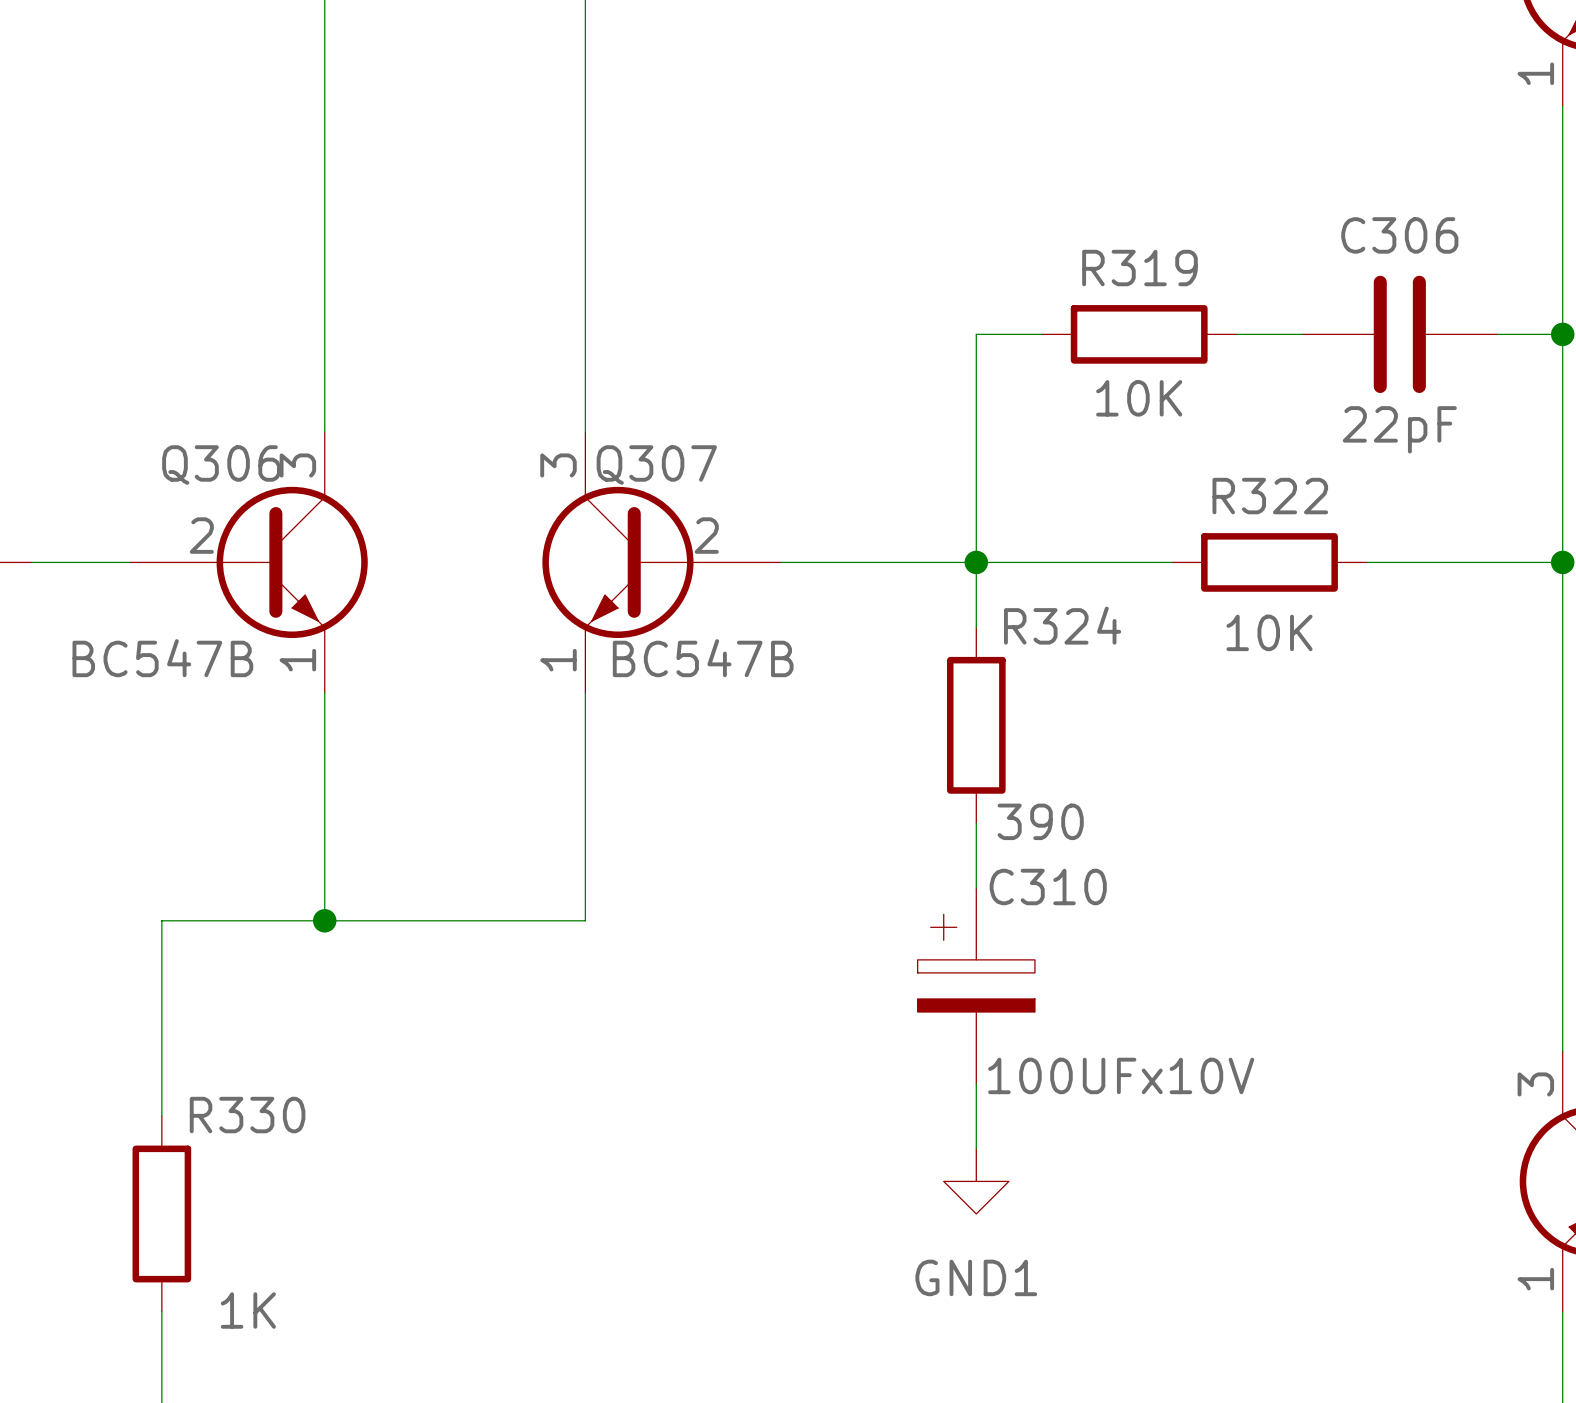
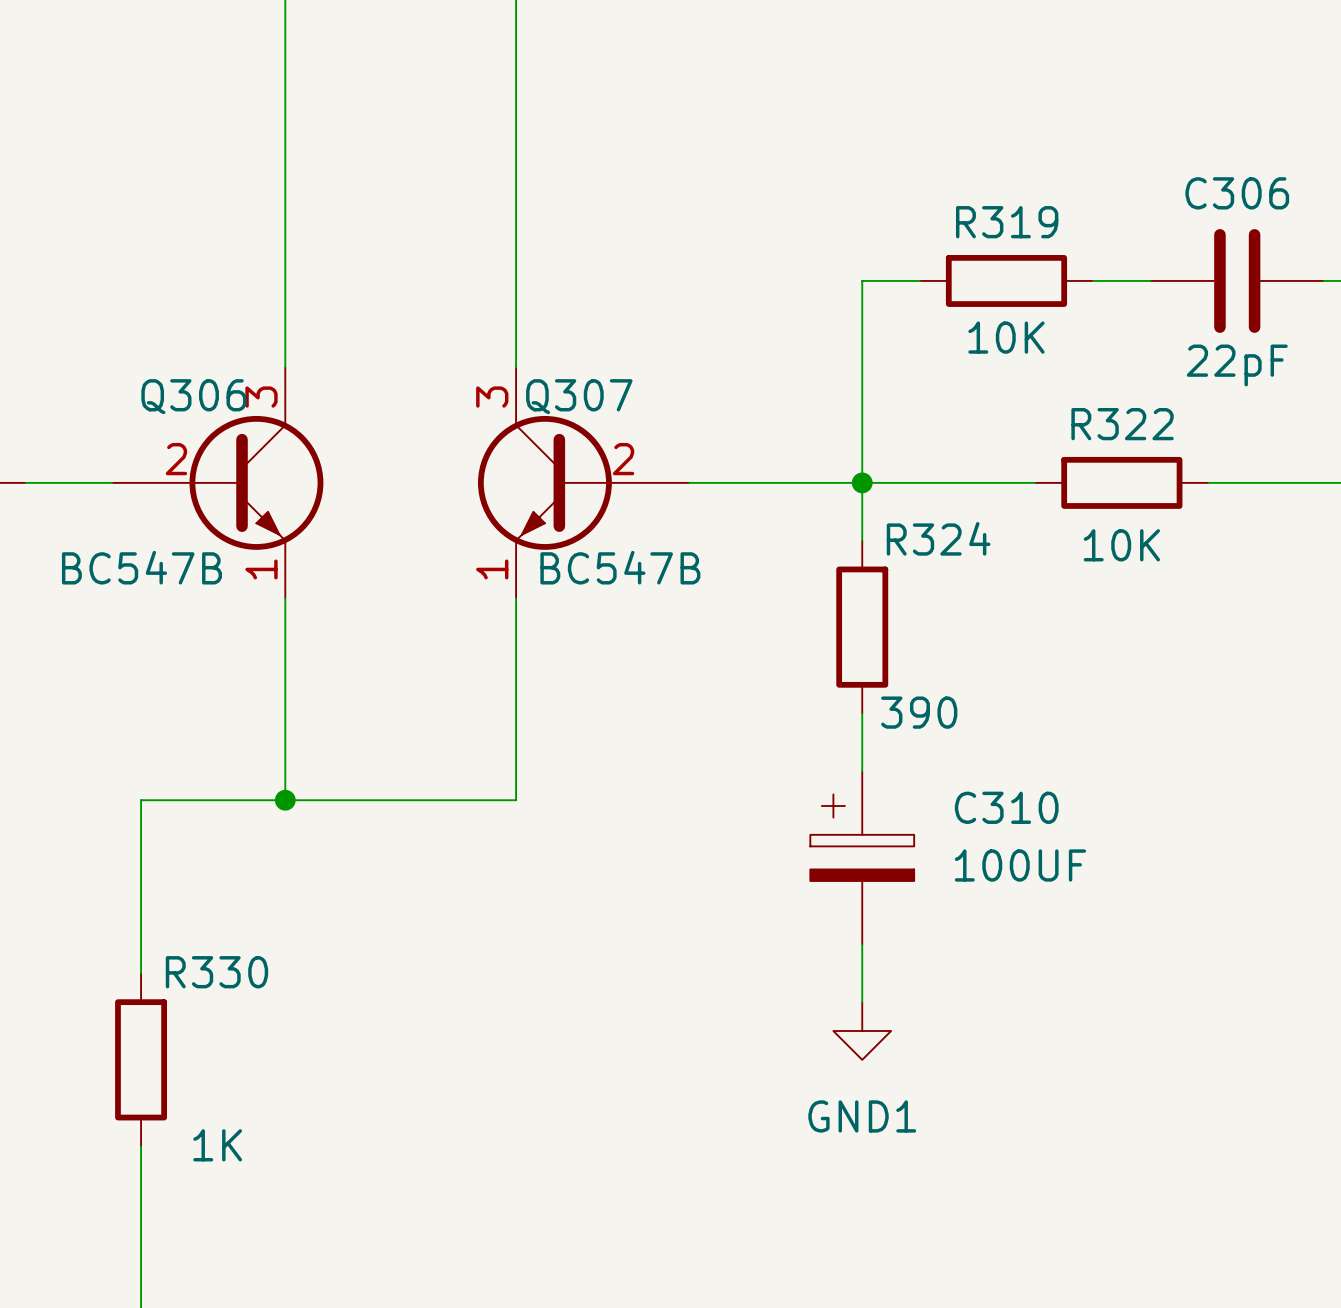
C310 name position: C310 (1048, 886) -> C310 (1006, 807)
C310 value: 100UFx10V (1121, 1075) -> 100UF (1020, 865)

